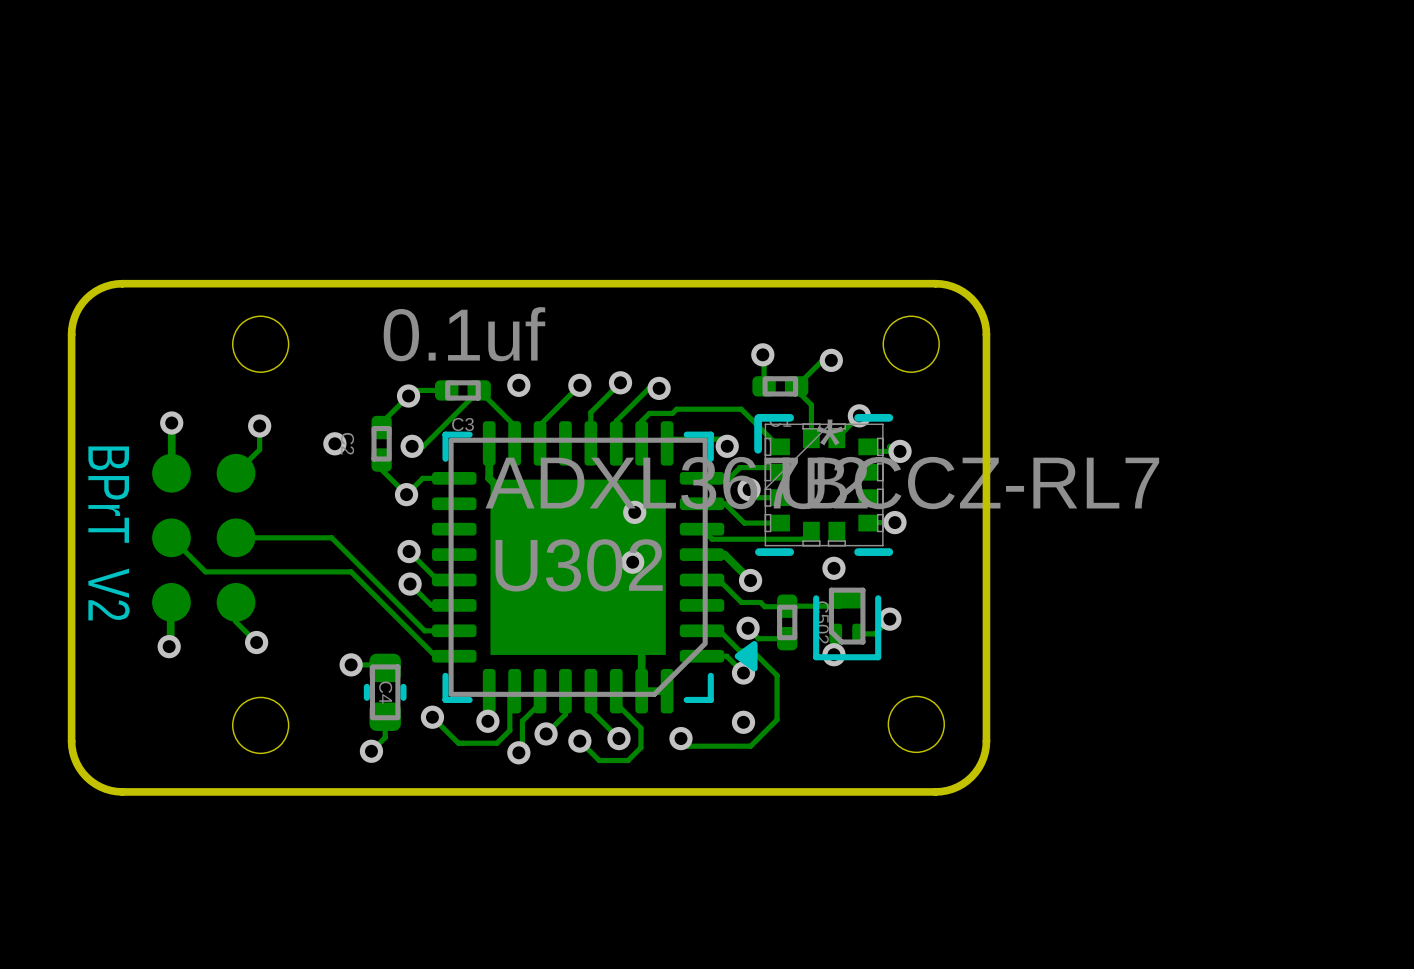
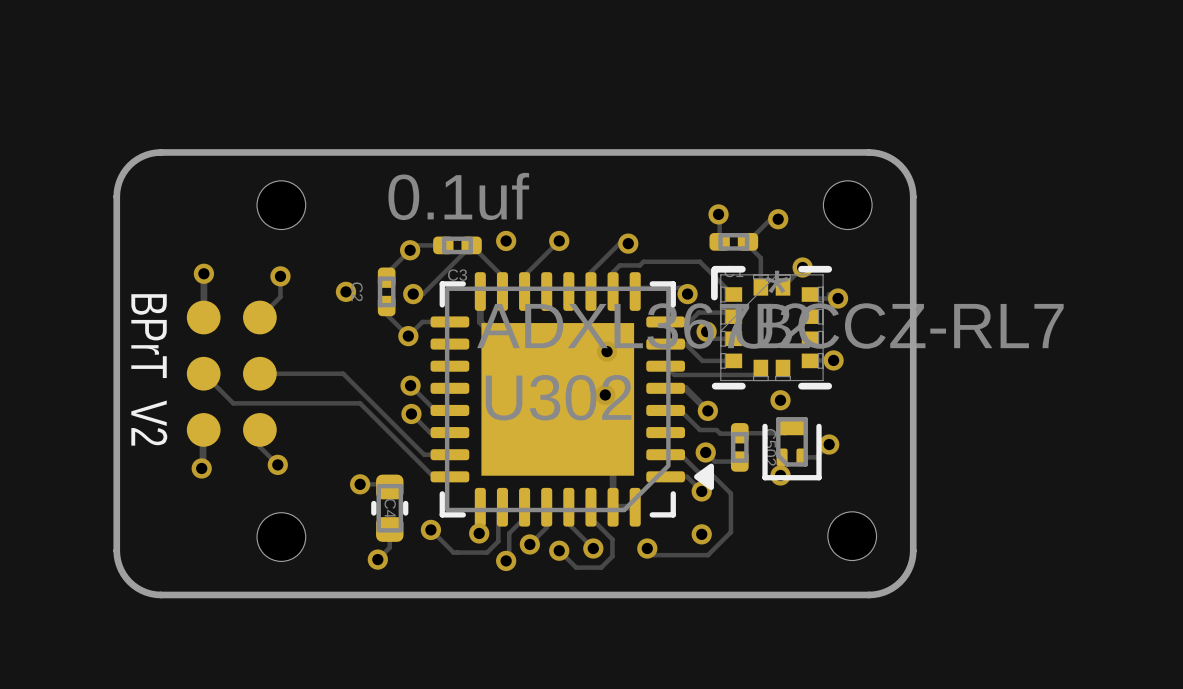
track: (620, 382) (590, 412) (590, 443) -> none
via: (620, 382) -> none

